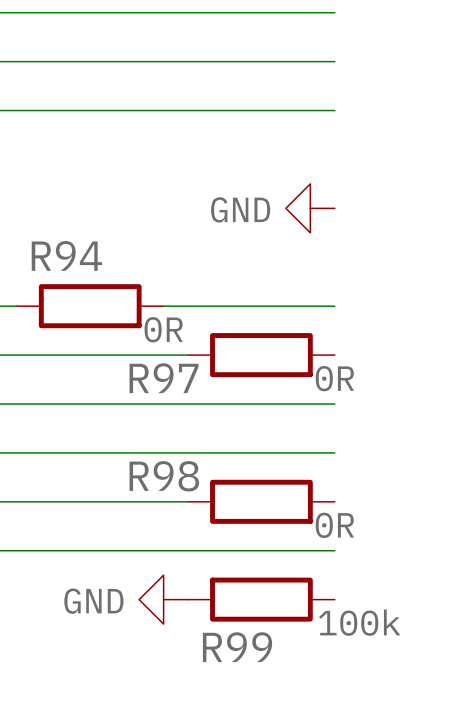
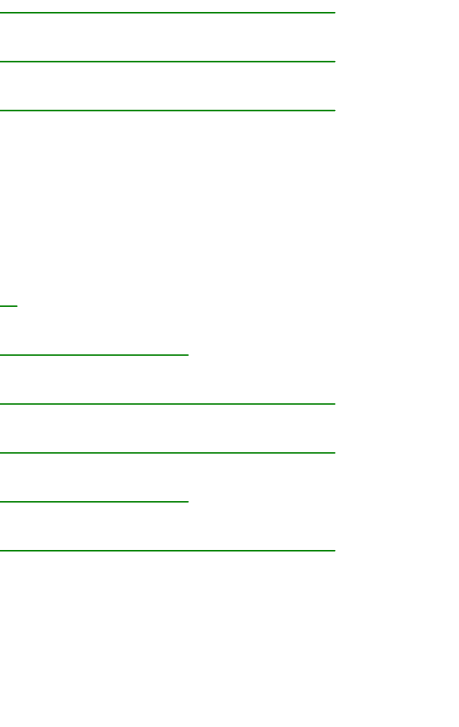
power symbol: GND (310, 208) -> none
R94: (90, 306) -> none
wire: (163, 306) (334, 306) -> none
R97: (261, 355) -> none
R98: (261, 501) -> none
power symbol: GND (163, 599) -> none
R99: (261, 599) -> none

